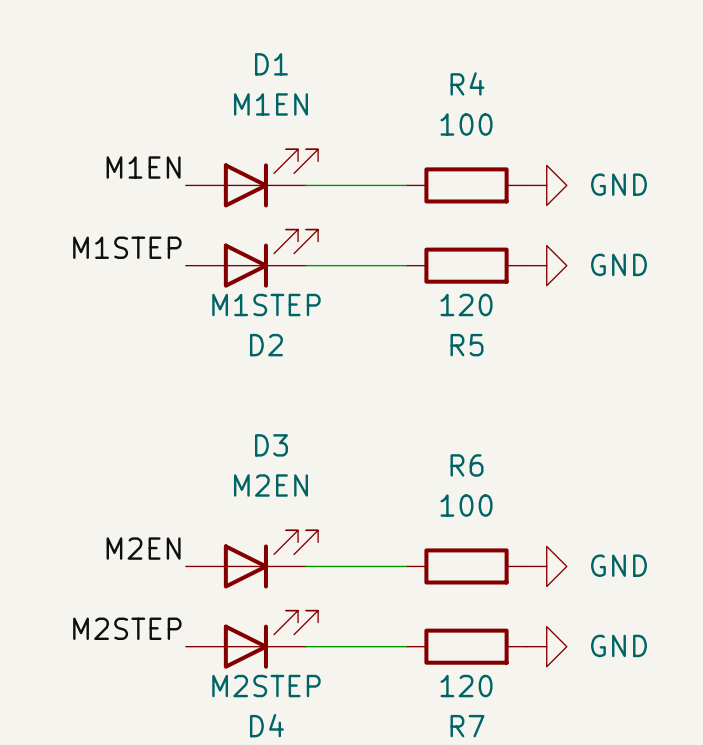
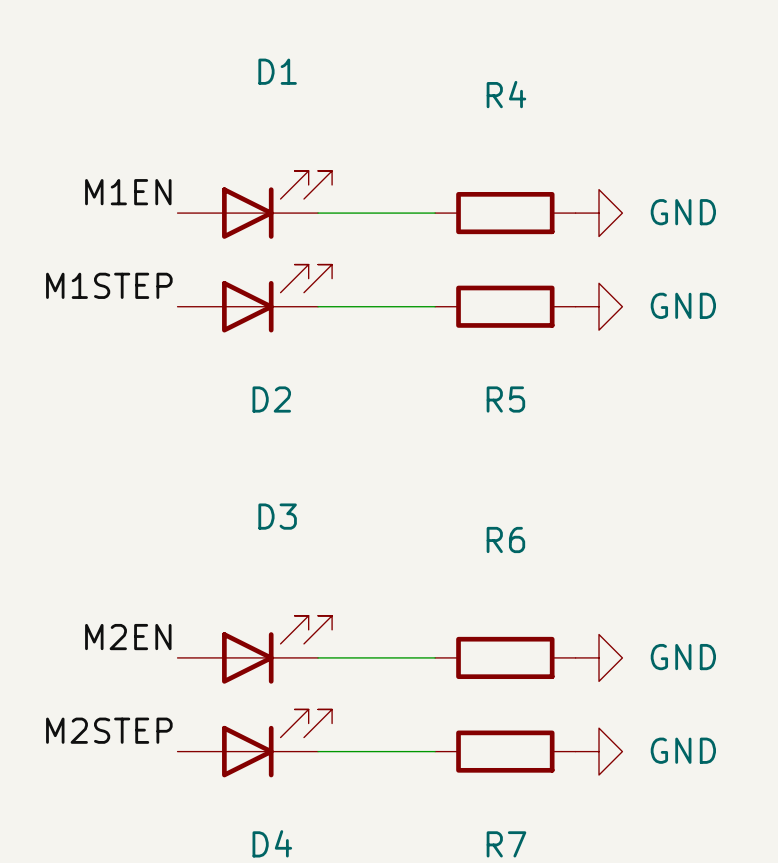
D1 value: M1EN (270, 104) -> none
R4 value: 100 (466, 124) -> none
D2 value: M1STEP (266, 305) -> none
R5 value: 120 (466, 305) -> none
D3 value: M2EN (270, 485) -> none
R6 value: 100 (466, 505) -> none
D4 value: M2STEP (266, 686) -> none
R7 value: 120 (466, 686) -> none

